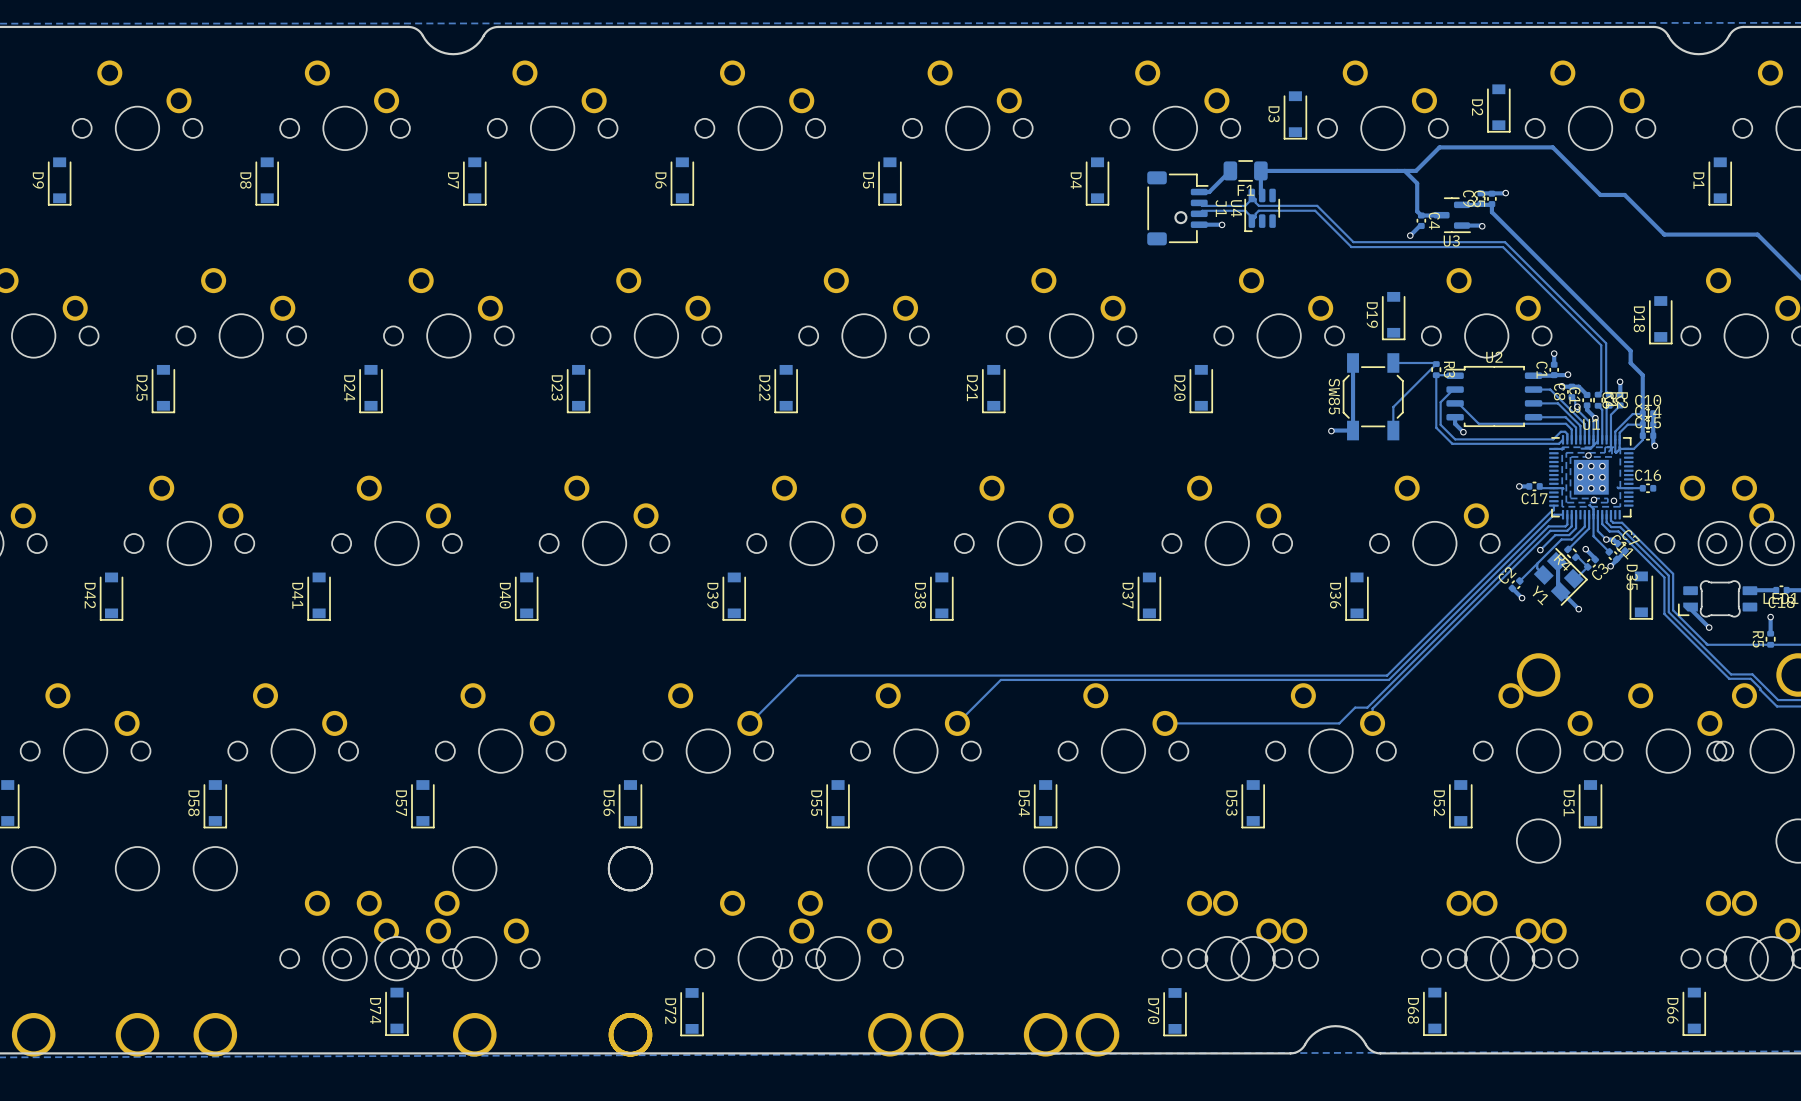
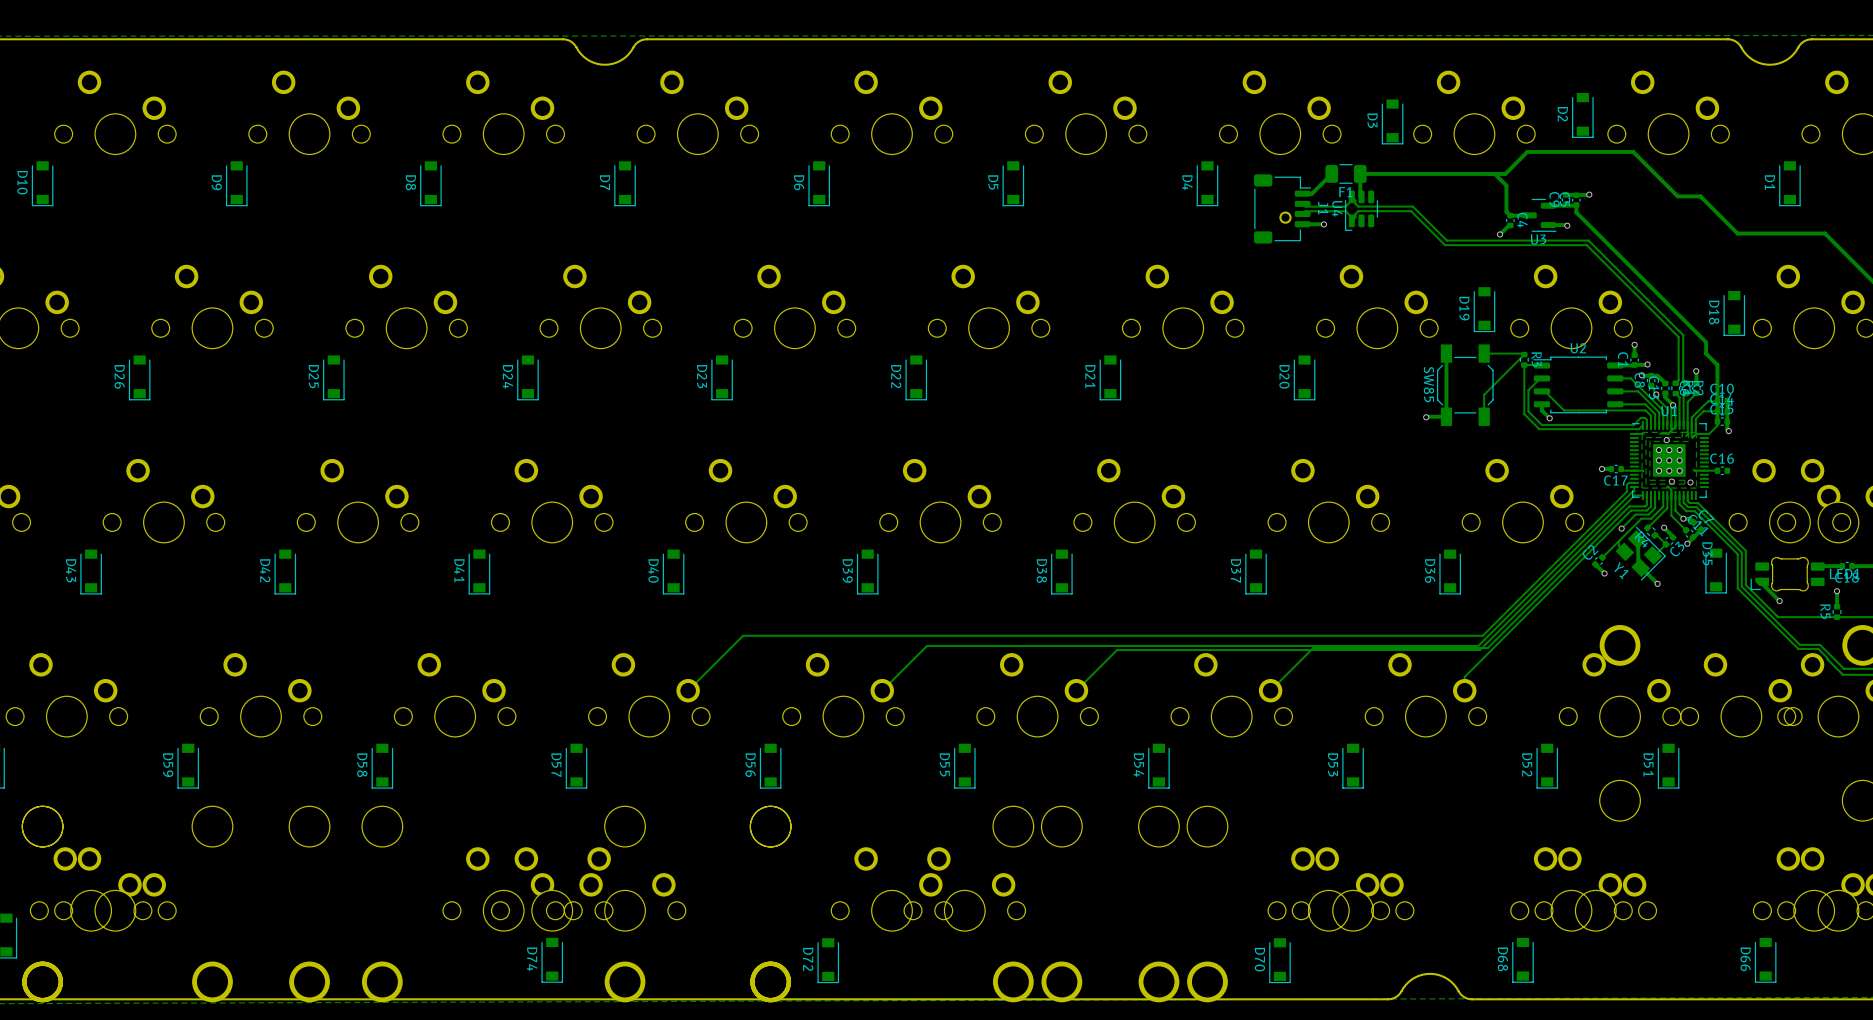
track: none -> (1634, 482) (1626, 484) (1626, 491) (1482, 635) (743, 635) (688, 690)
track: (1397, 677) (1367, 707) (1355, 707) (1339, 723) (1164, 723) -> (1487, 648) (1313, 648) (1274, 686)

